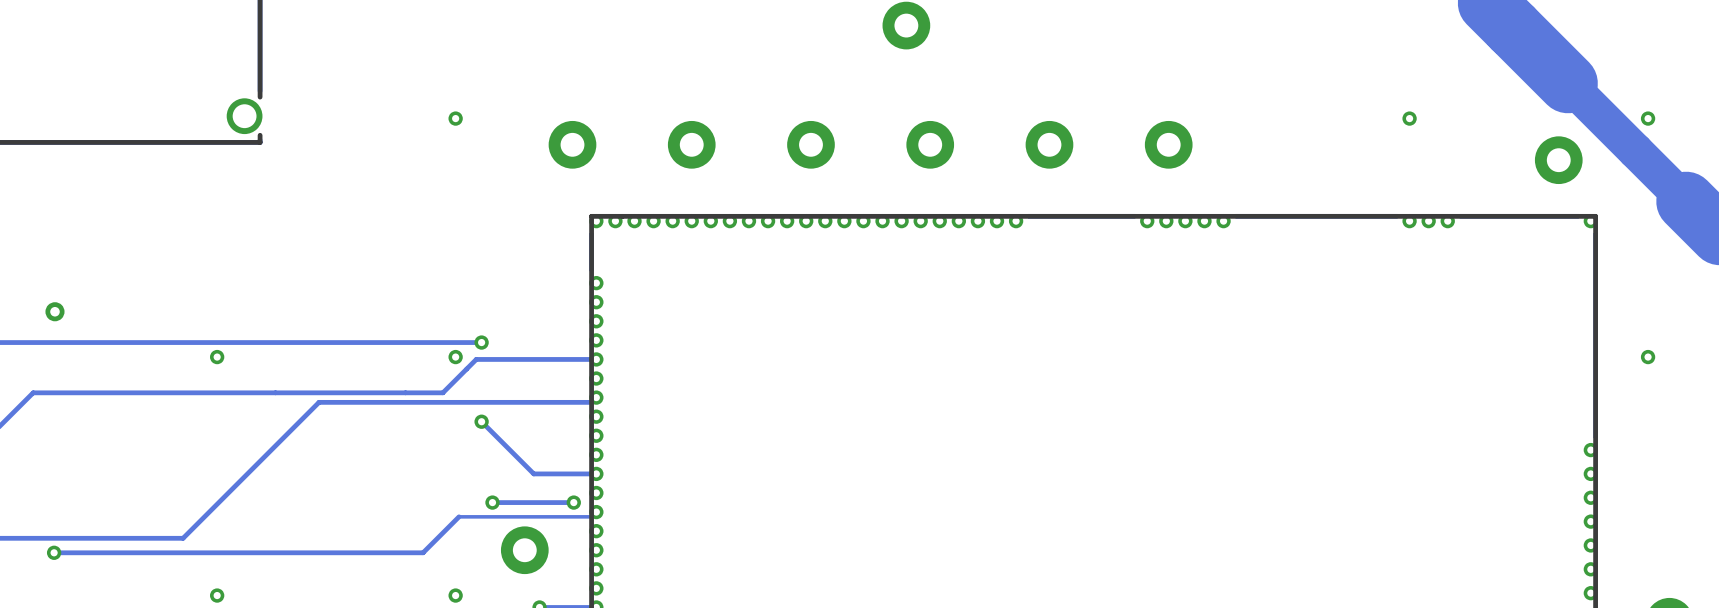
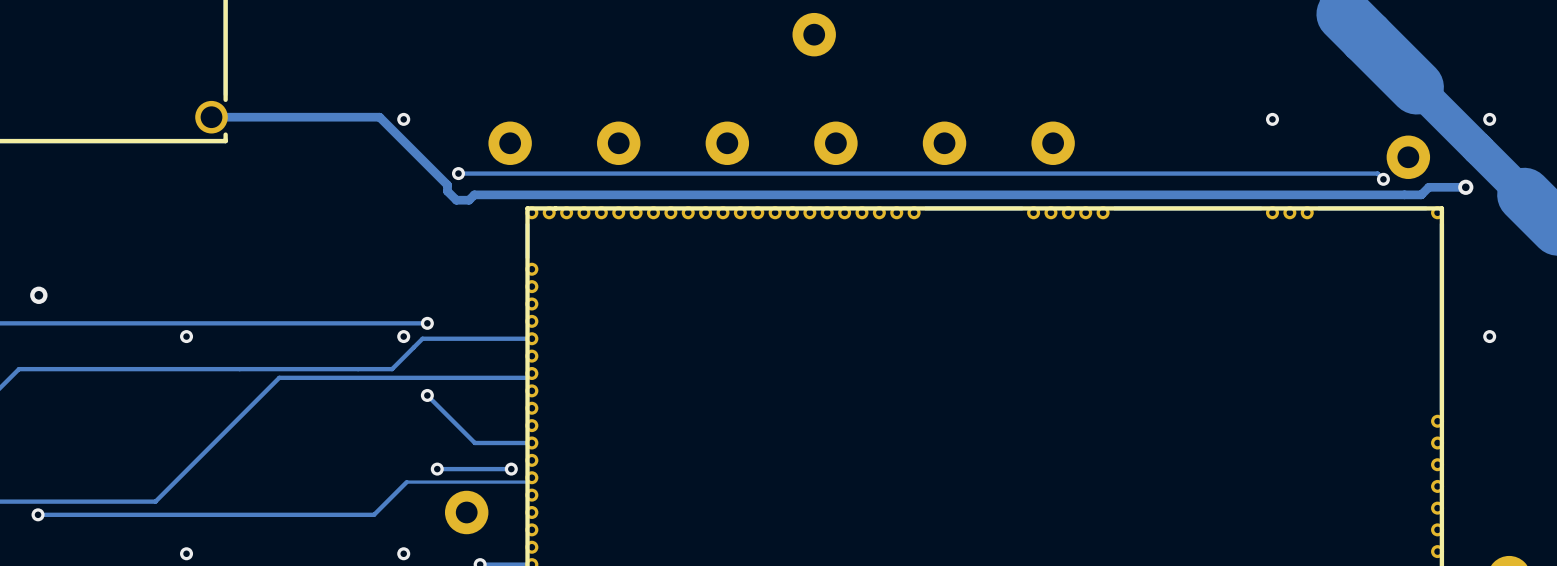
track: none -> (211, 117) (379, 117) (447, 185) (447, 191) (456, 200) (469, 200) (474, 194) (1421, 194) (1428, 187) (1465, 187)
track: none -> (458, 173) (1377, 173) (1383, 179)
via: none -> (458, 173)
via: none -> (1383, 179)
via: none -> (1465, 187)

